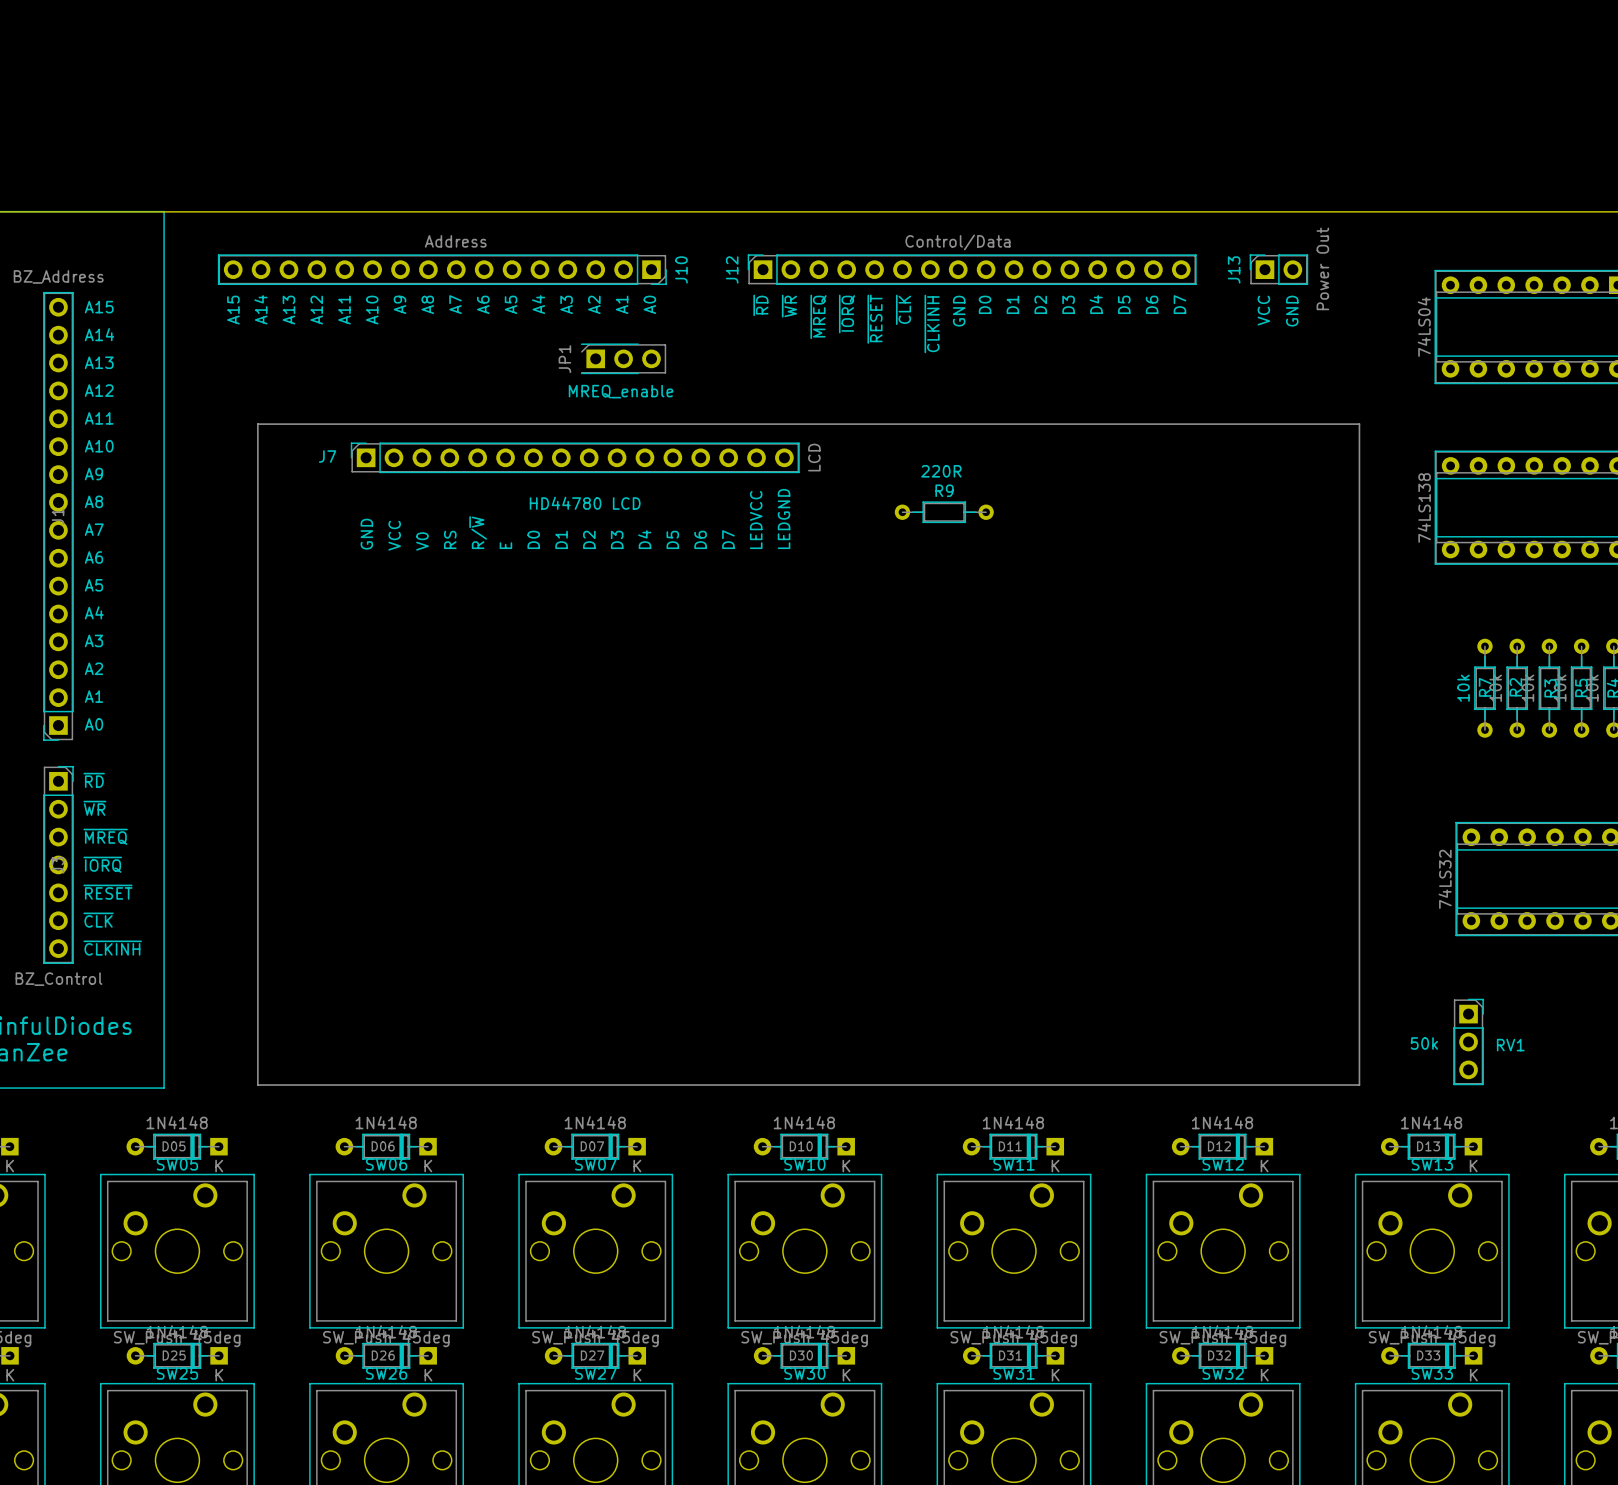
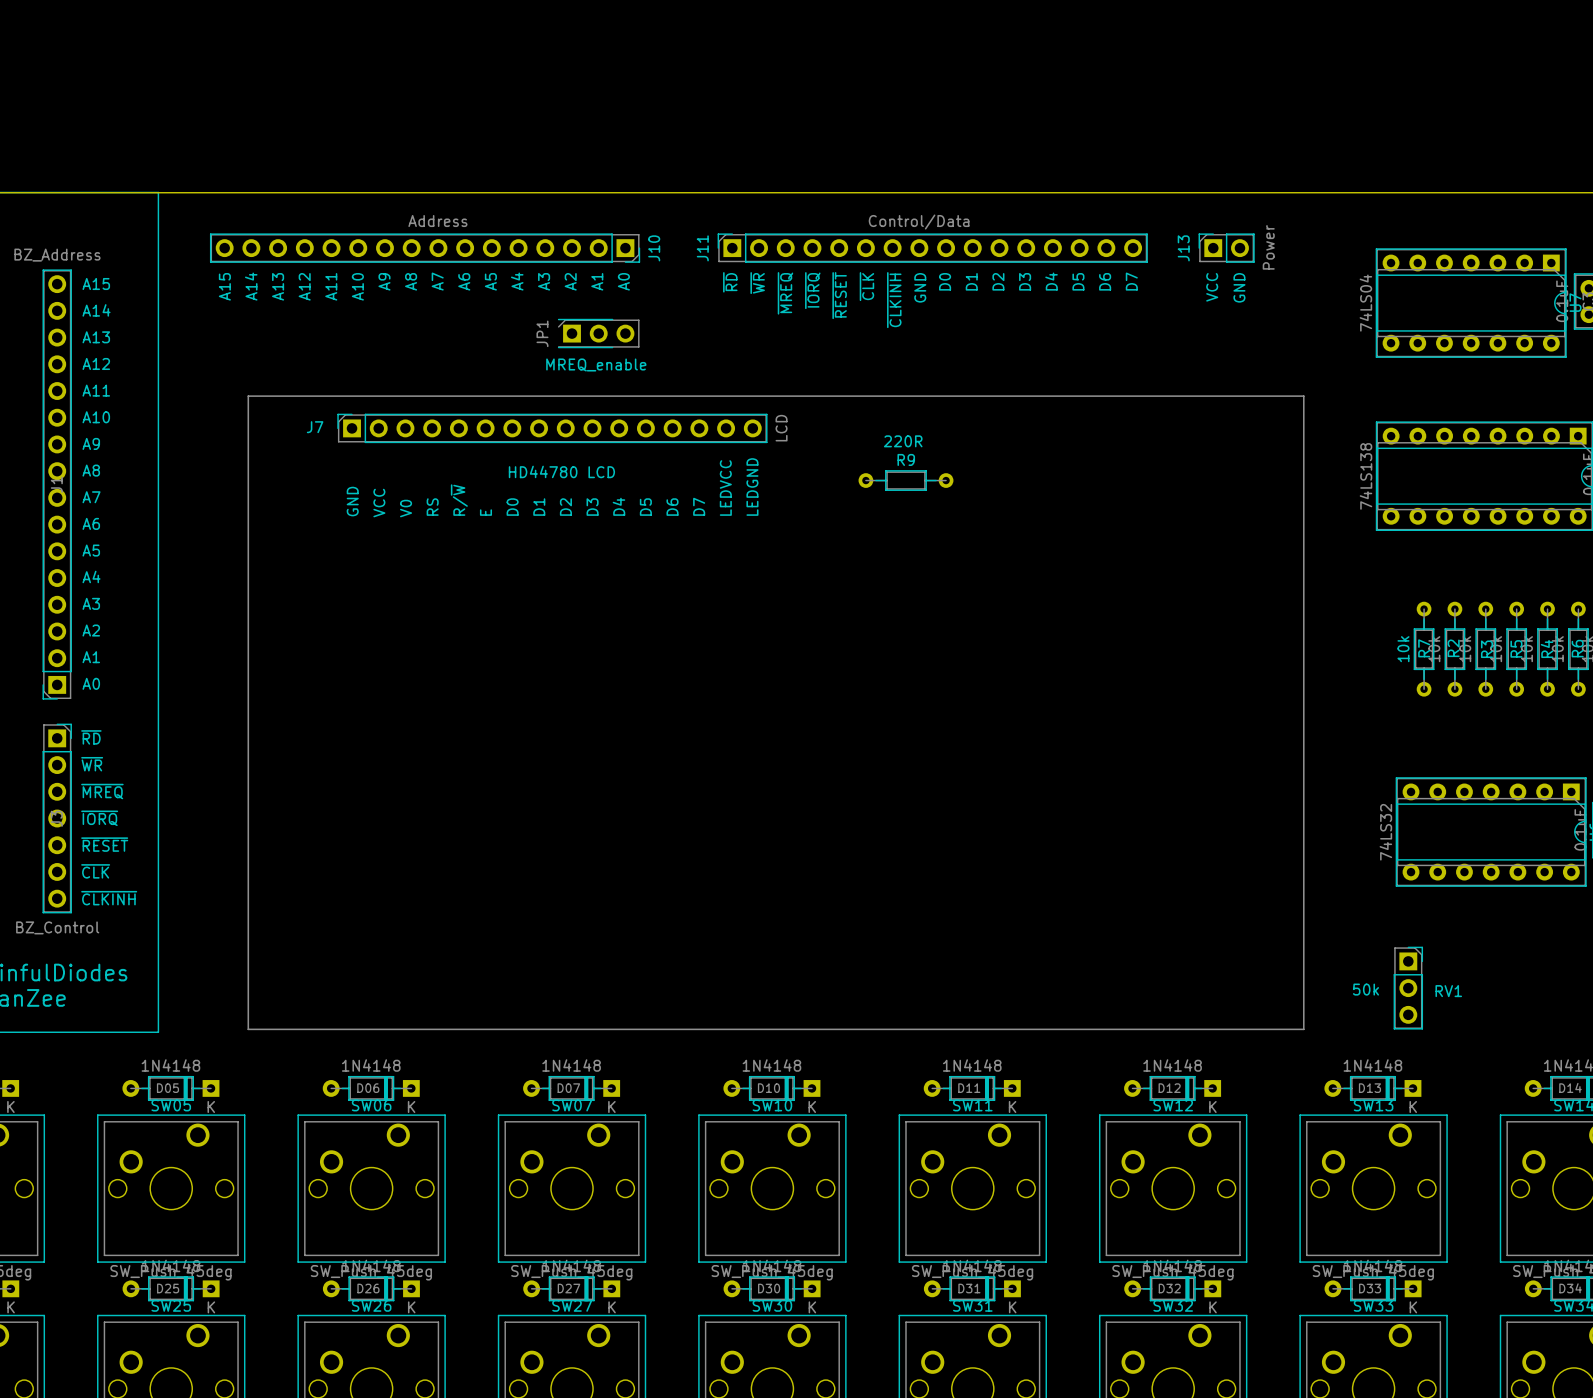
J13 value: Power Out (1322, 268) -> Power (1268, 247)
J12 name: J12 (732, 269) -> J11 (702, 248)

